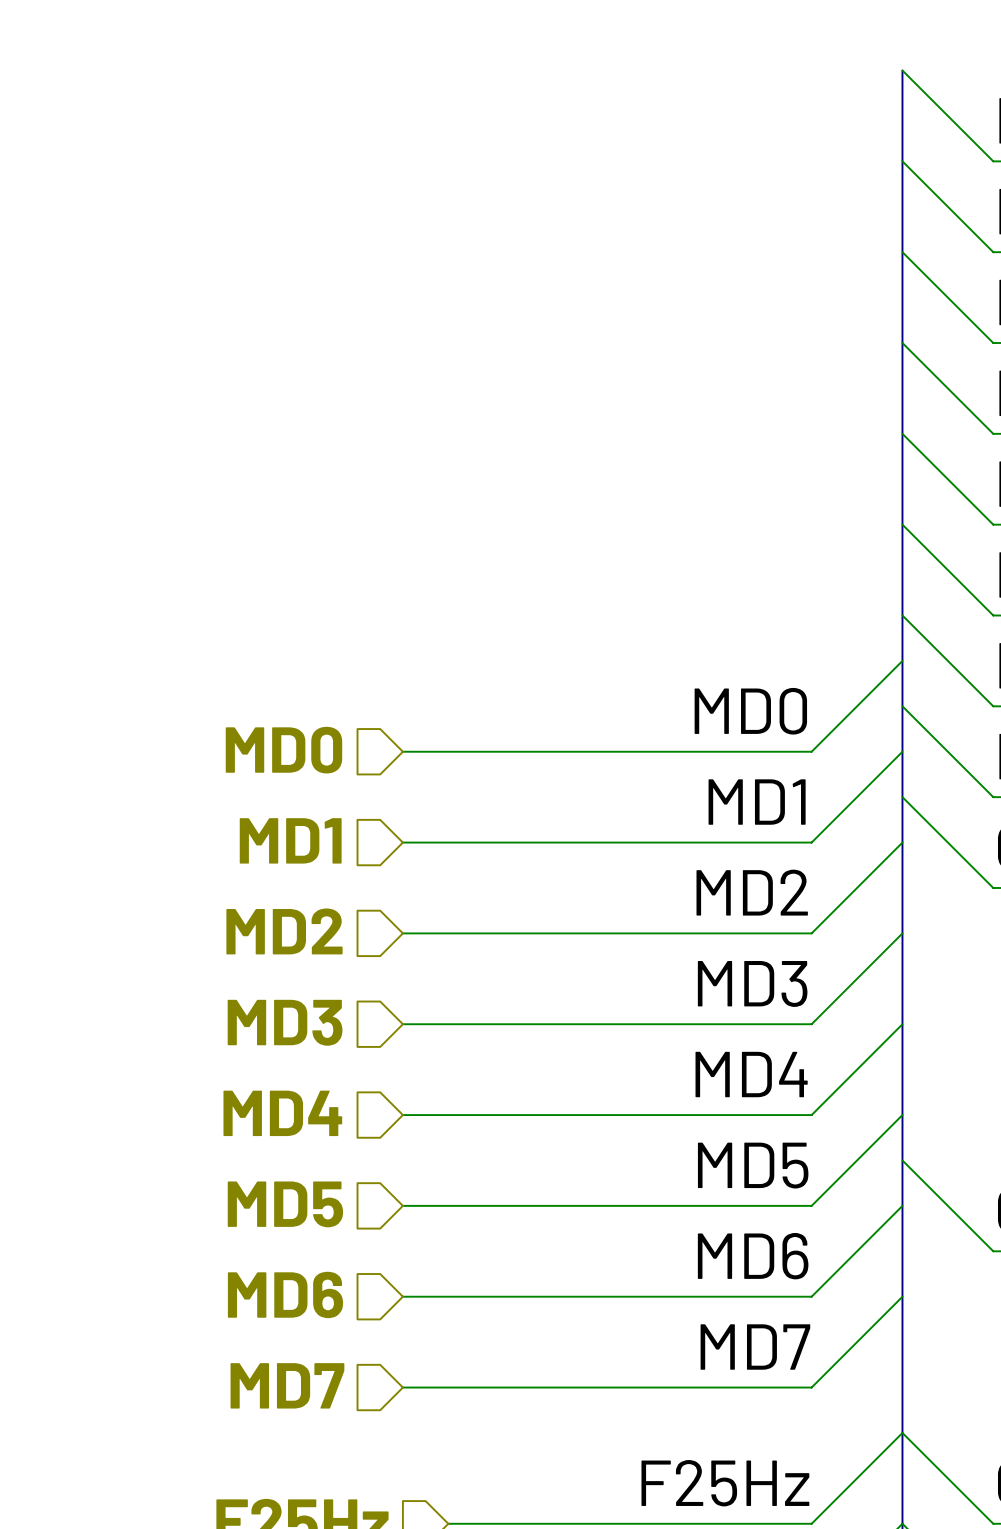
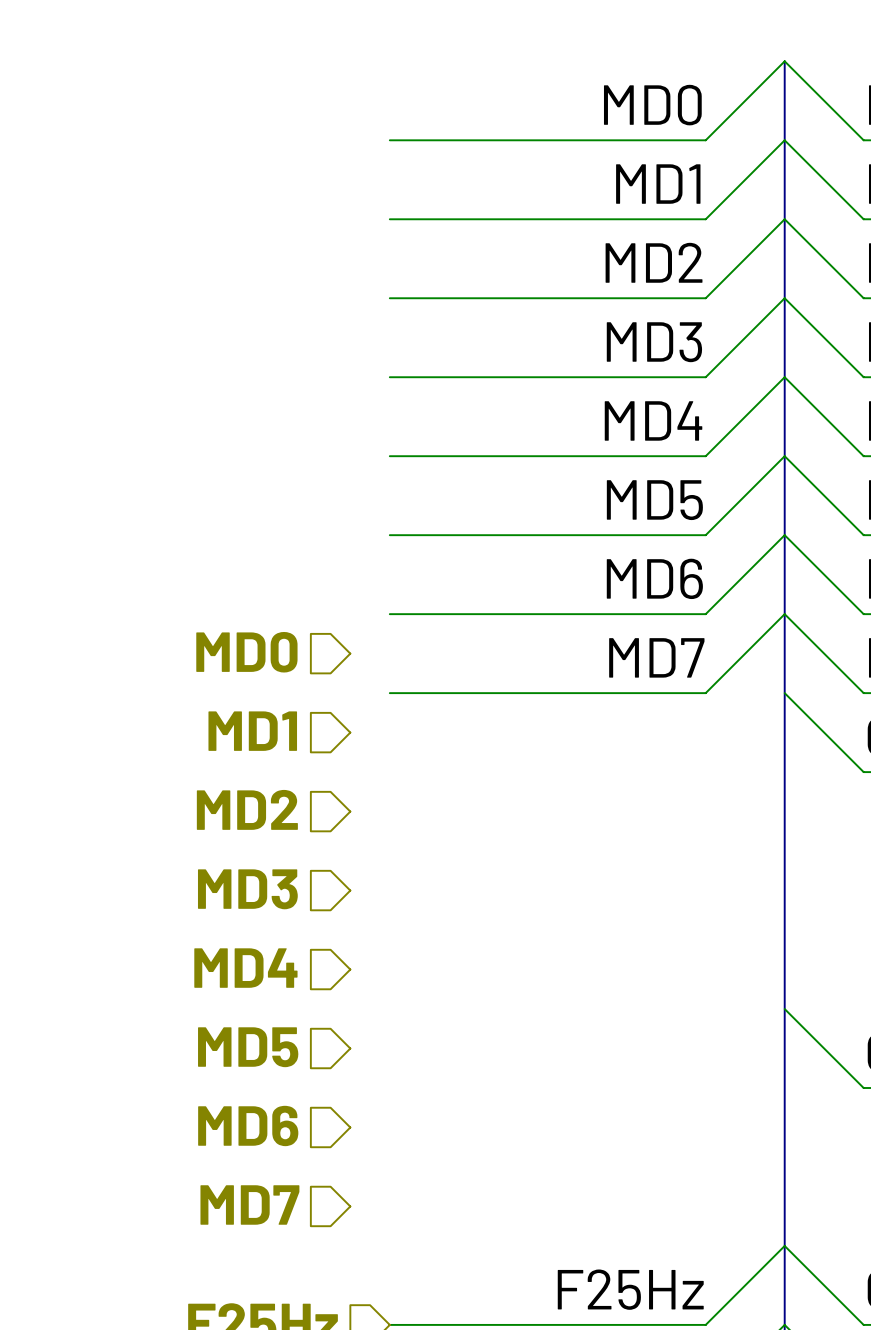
wire: none -> (784, 61) (705, 140) (389, 140)
wire: none -> (784, 140) (705, 219) (389, 219)
wire: none -> (784, 219) (705, 298) (389, 298)
wire: none -> (784, 298) (705, 377) (389, 377)
wire: none -> (784, 377) (705, 456) (389, 456)
wire: none -> (784, 456) (705, 535) (389, 535)
wire: none -> (784, 535) (705, 614) (389, 614)
wire: (902, 660) (811, 751) (402, 751) -> none
wire: none -> (784, 614) (705, 693) (389, 693)
label position: MD0 (750, 711) -> MD0 (652, 105)
wire: (902, 751) (811, 842) (402, 842) -> none
label position: MD1 (757, 802) -> MD1 (658, 184)
wire: (902, 842) (811, 933) (402, 933) -> none
label position: MD2 (752, 892) -> MD2 (654, 262)
wire: (902, 933) (811, 1024) (402, 1024) -> none
label position: MD3 (752, 983) -> MD3 (654, 342)
wire: (902, 1024) (811, 1115) (402, 1115) -> none
label position: MD4 (751, 1074) -> MD4 (653, 420)
wire: (902, 1115) (811, 1205) (402, 1205) -> none
label position: MD5 (753, 1165) -> MD5 (654, 500)
wire: (902, 1205) (811, 1296) (402, 1296) -> none
label position: MD6 (753, 1256) -> MD6 (654, 578)
wire: (902, 1296) (811, 1387) (402, 1387) -> none
label position: MD7 (755, 1347) -> MD7 (656, 657)

